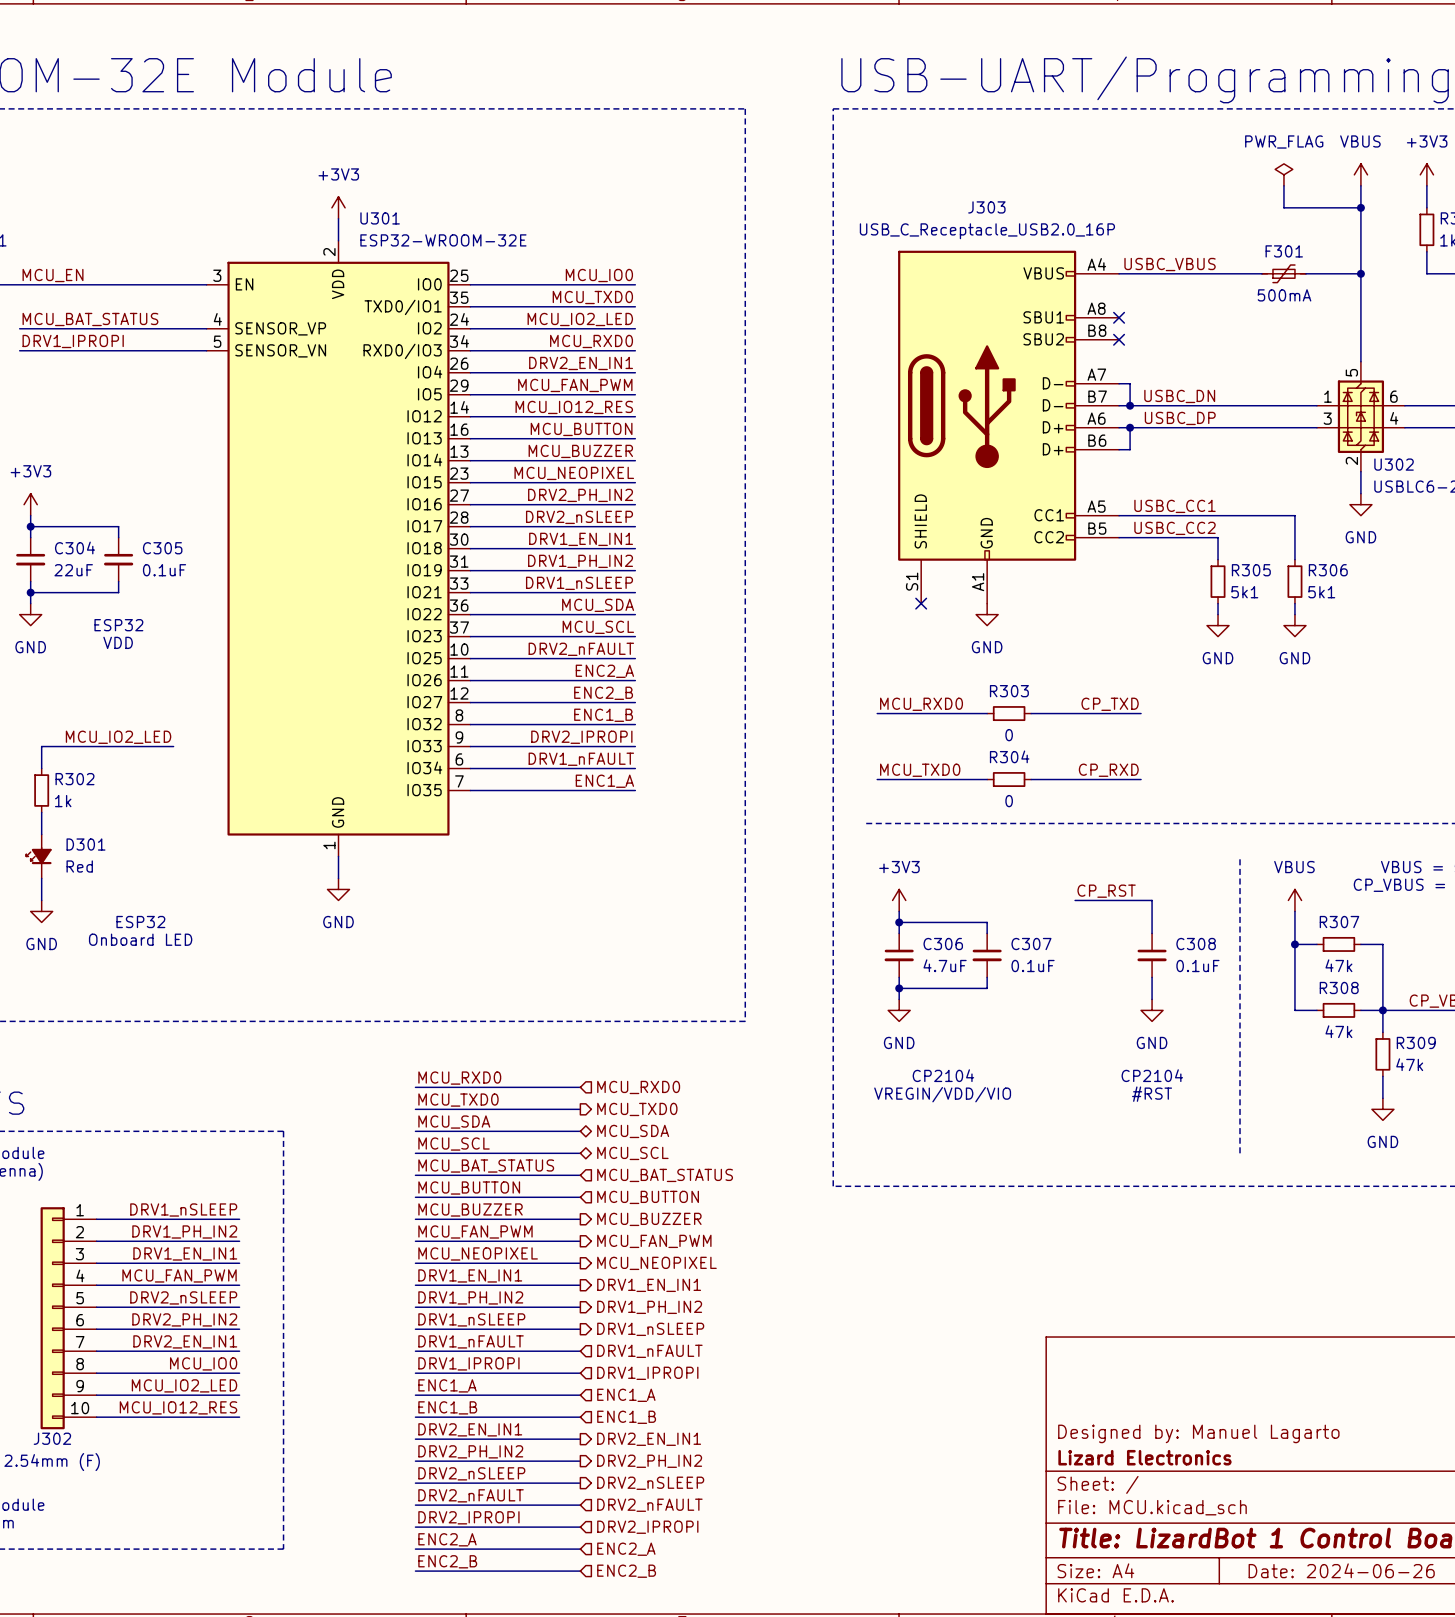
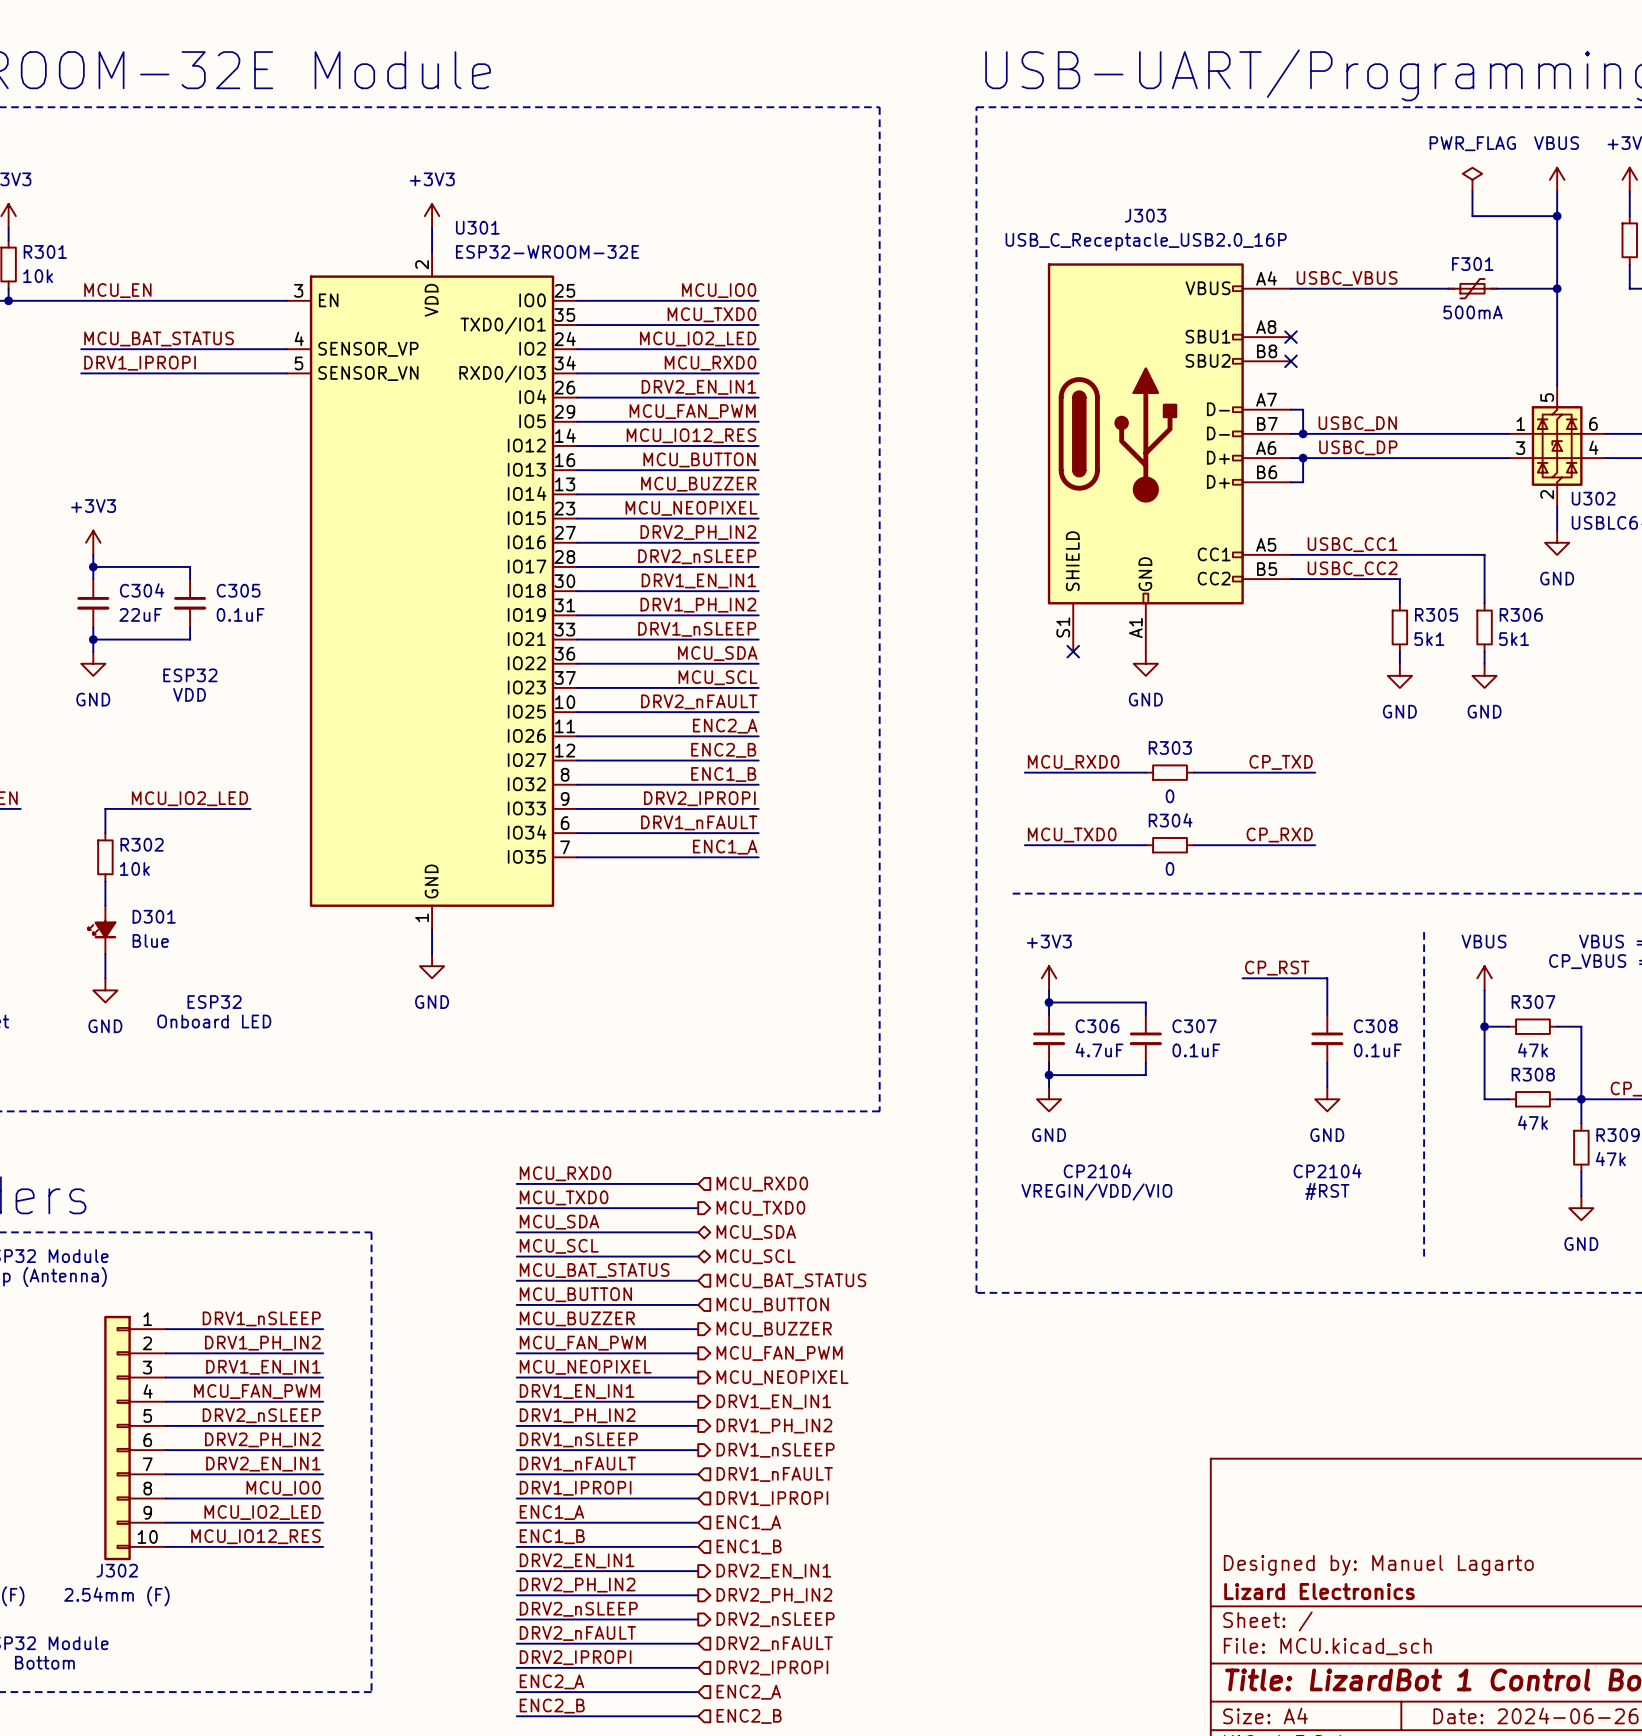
R302 value: 1k (63, 801) -> 10k (134, 868)
D301 value: Red (79, 866) -> Blue (150, 940)

